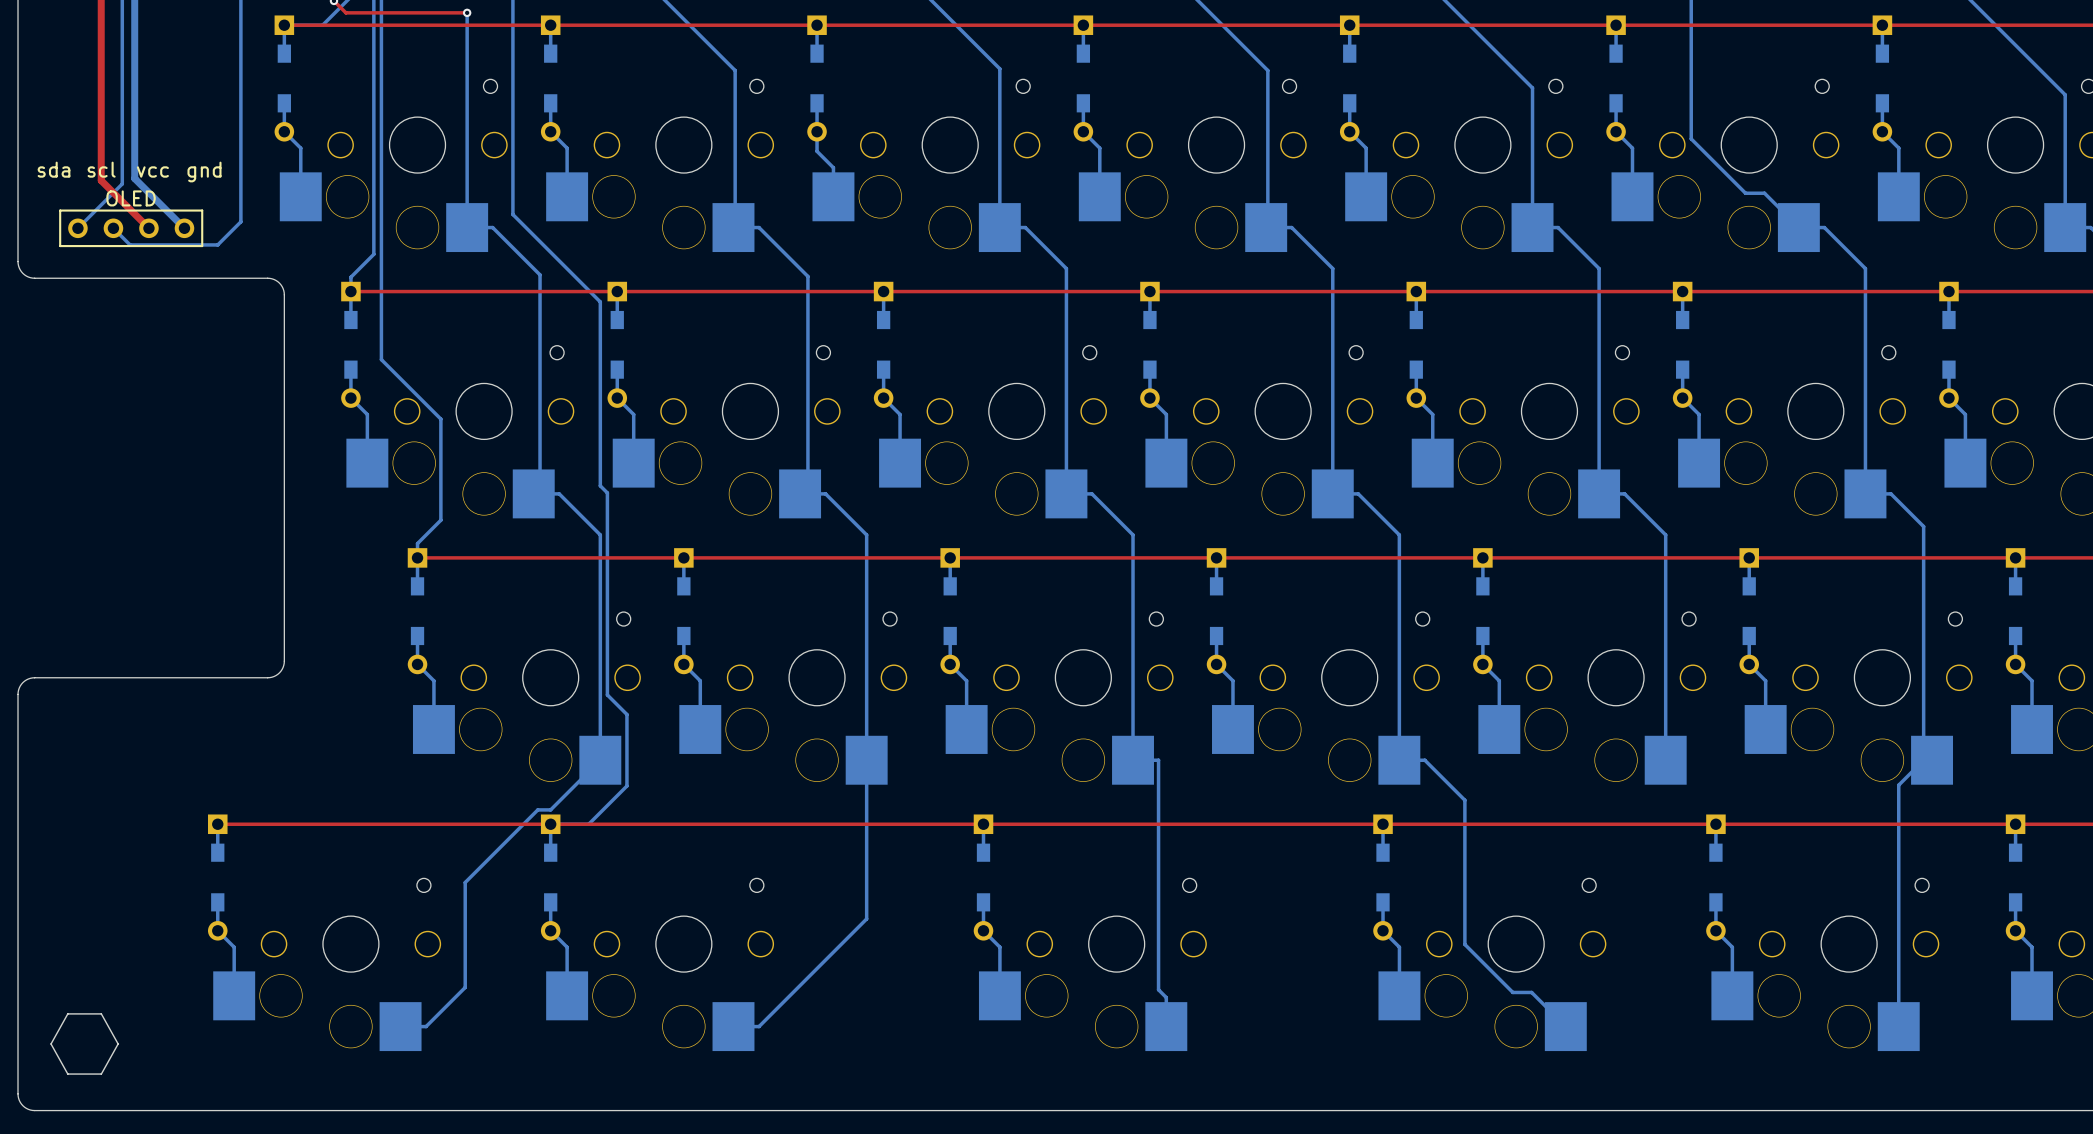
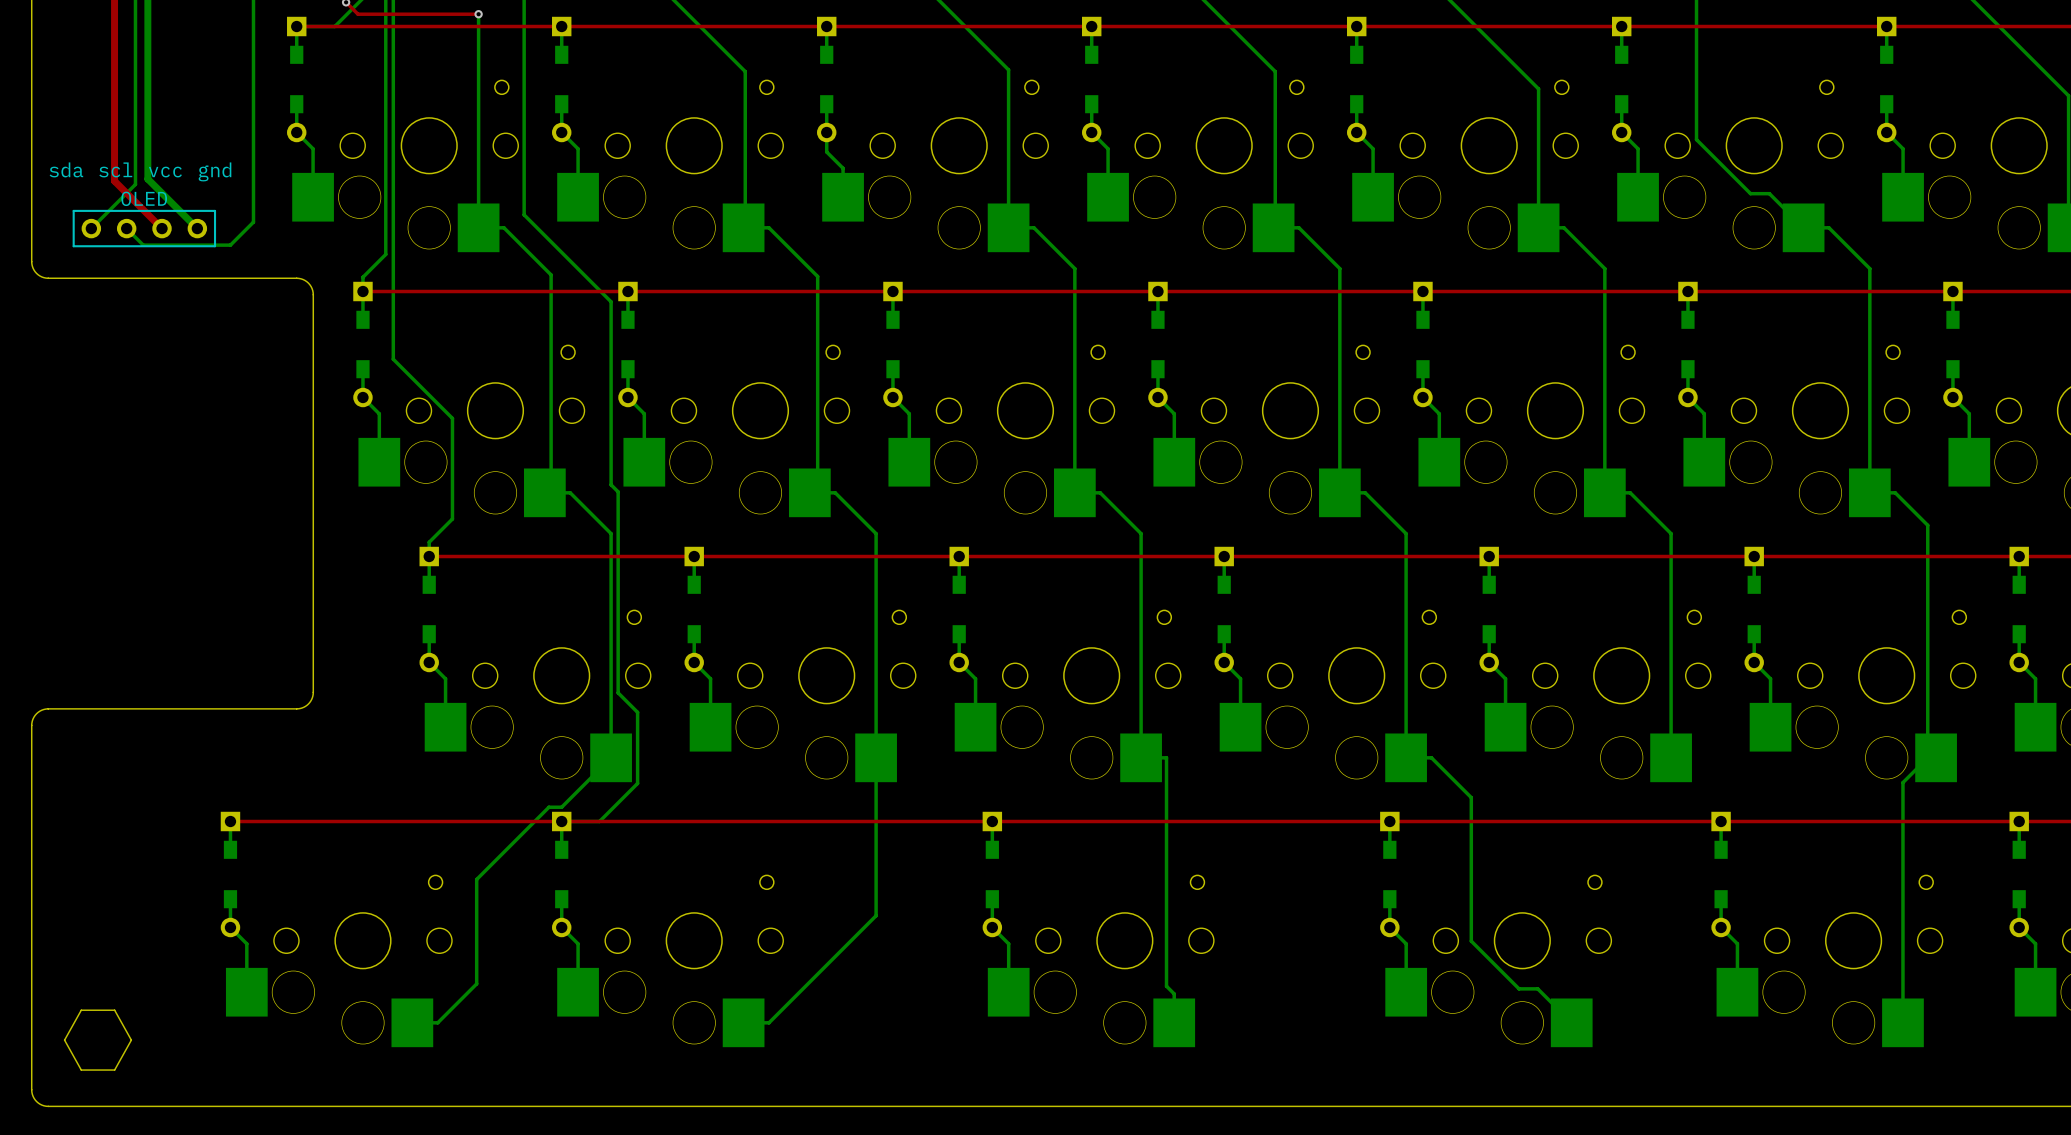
board edge: (267, 278) (279, 283) (284, 294) (284, 661) (282, 669) (276, 675) (267, 677) (30, 678) (22, 682) (18, 690) (18, 727) -> (280, 278) (303, 279) (309, 284) (313, 292) (313, 692) (310, 701) (305, 706) (296, 708) (46, 709) (35, 715) (31, 725)

